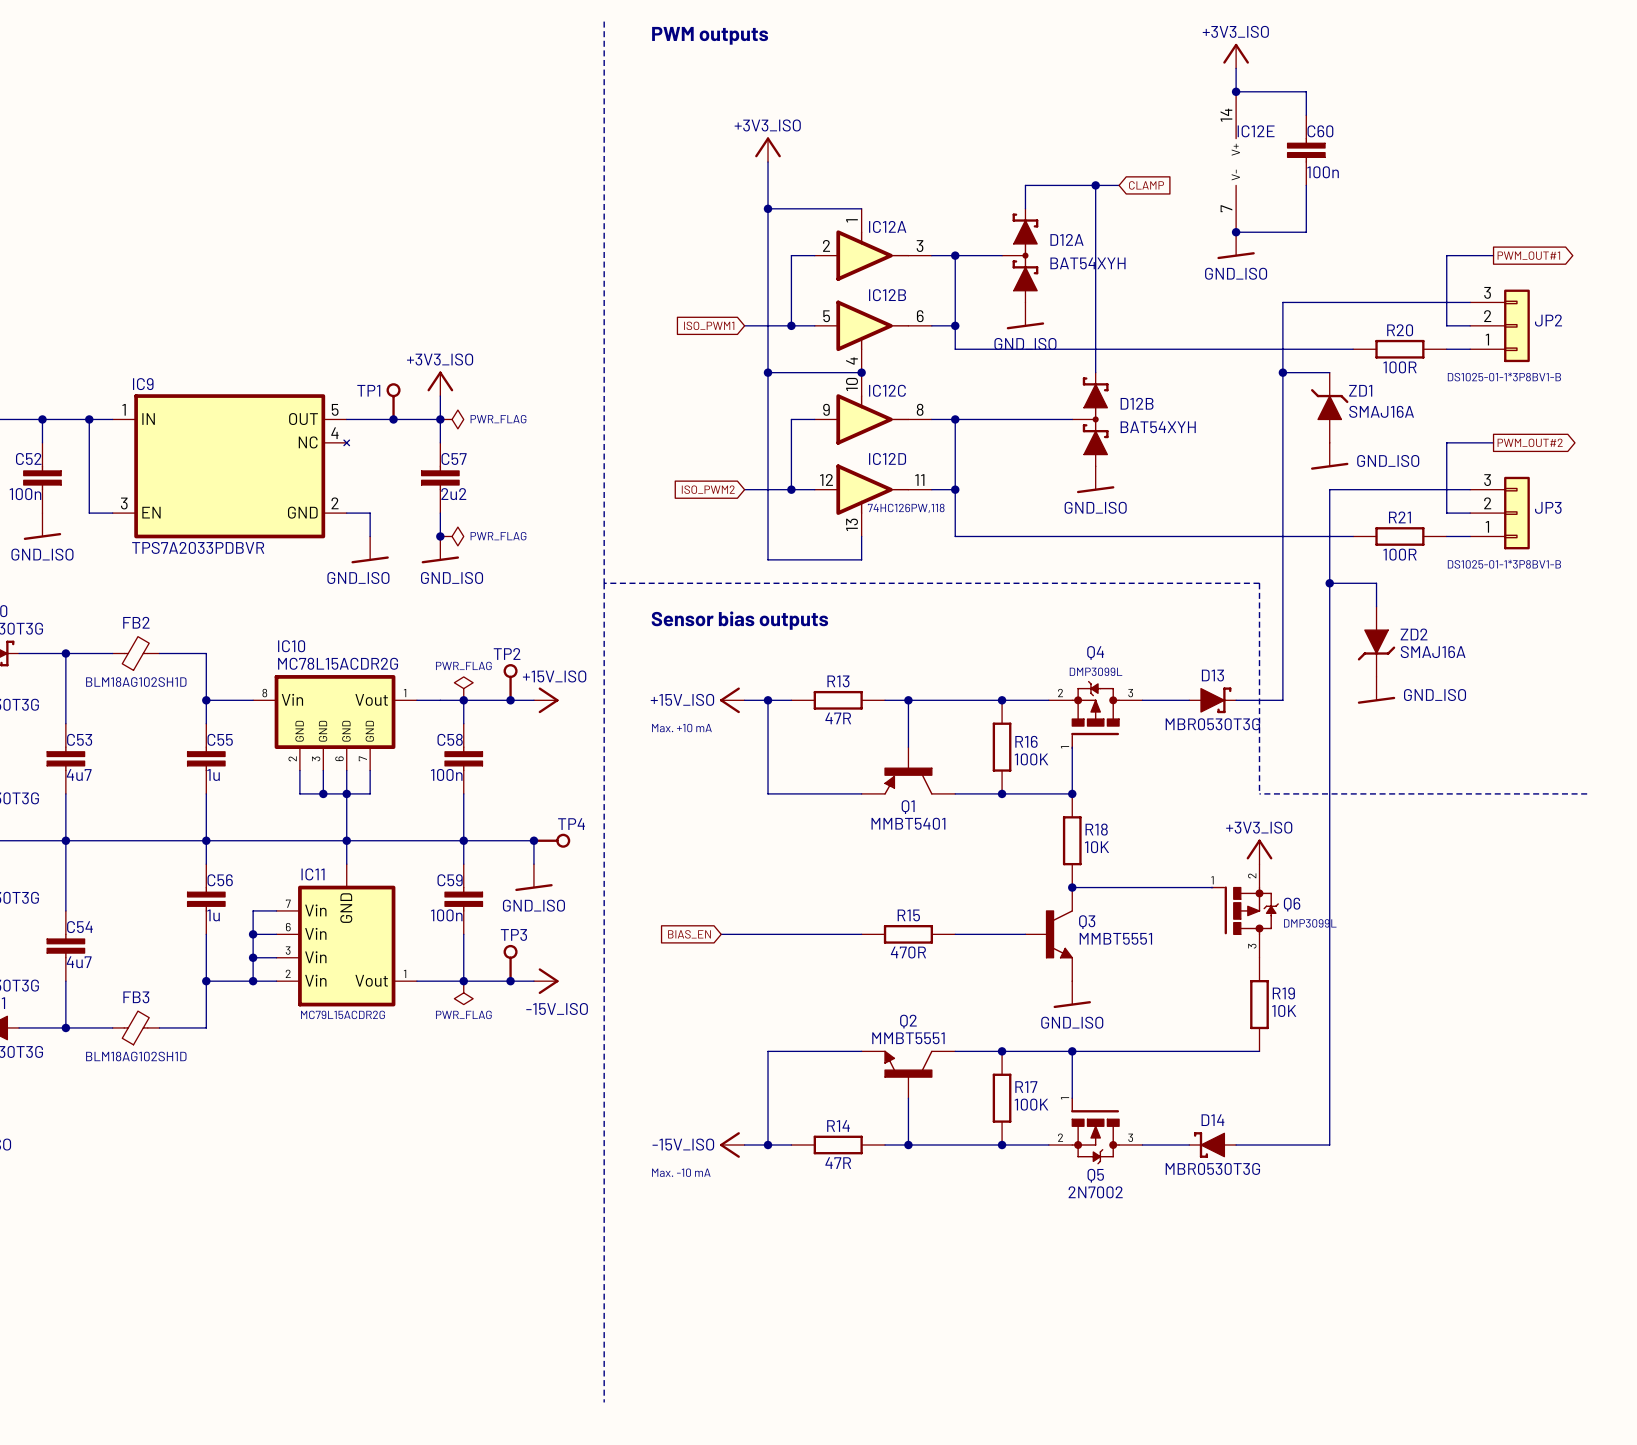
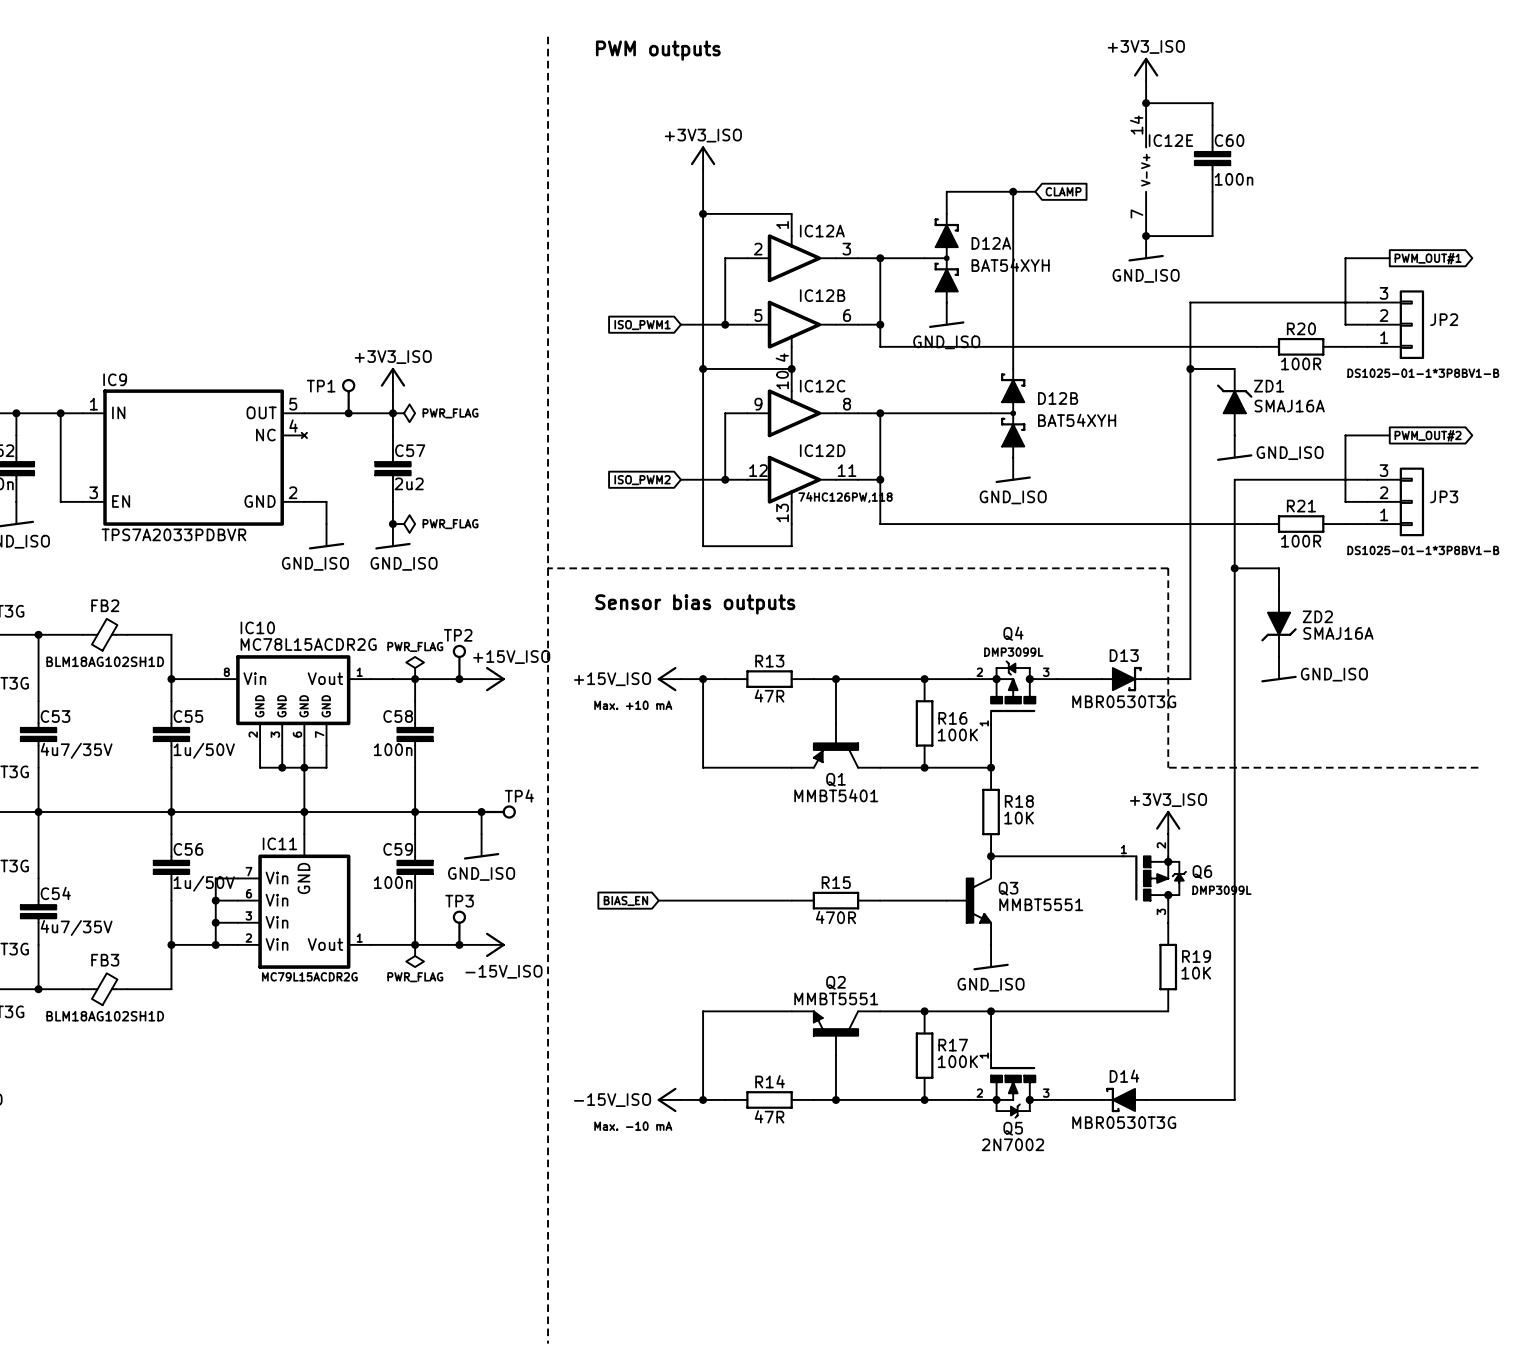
C53 value: 4u7 (79, 775) -> 4u7/35V (76, 750)
C55 value: 1u (213, 775) -> 1u/50V (204, 750)
C56 value: 1u (213, 915) -> 1u/50V (204, 883)
C54 value: 4u7 (79, 962) -> 4u7/35V (76, 928)

